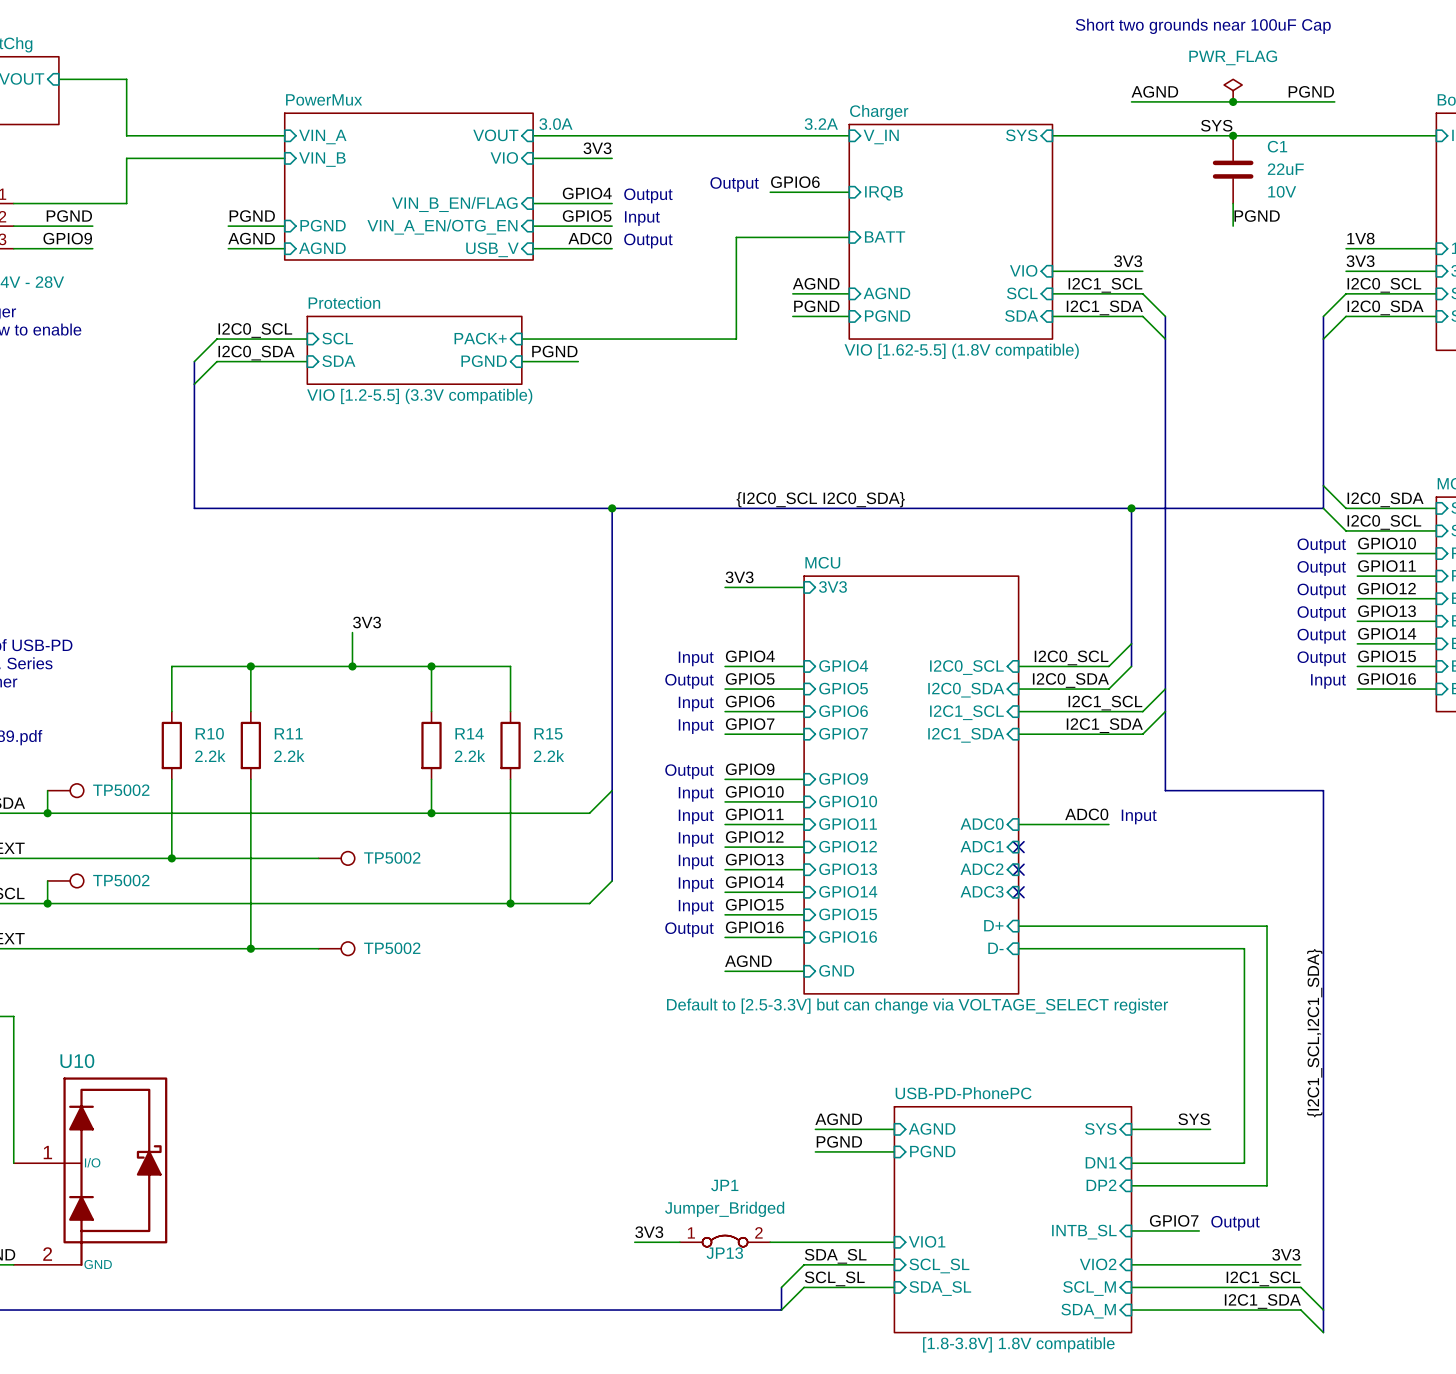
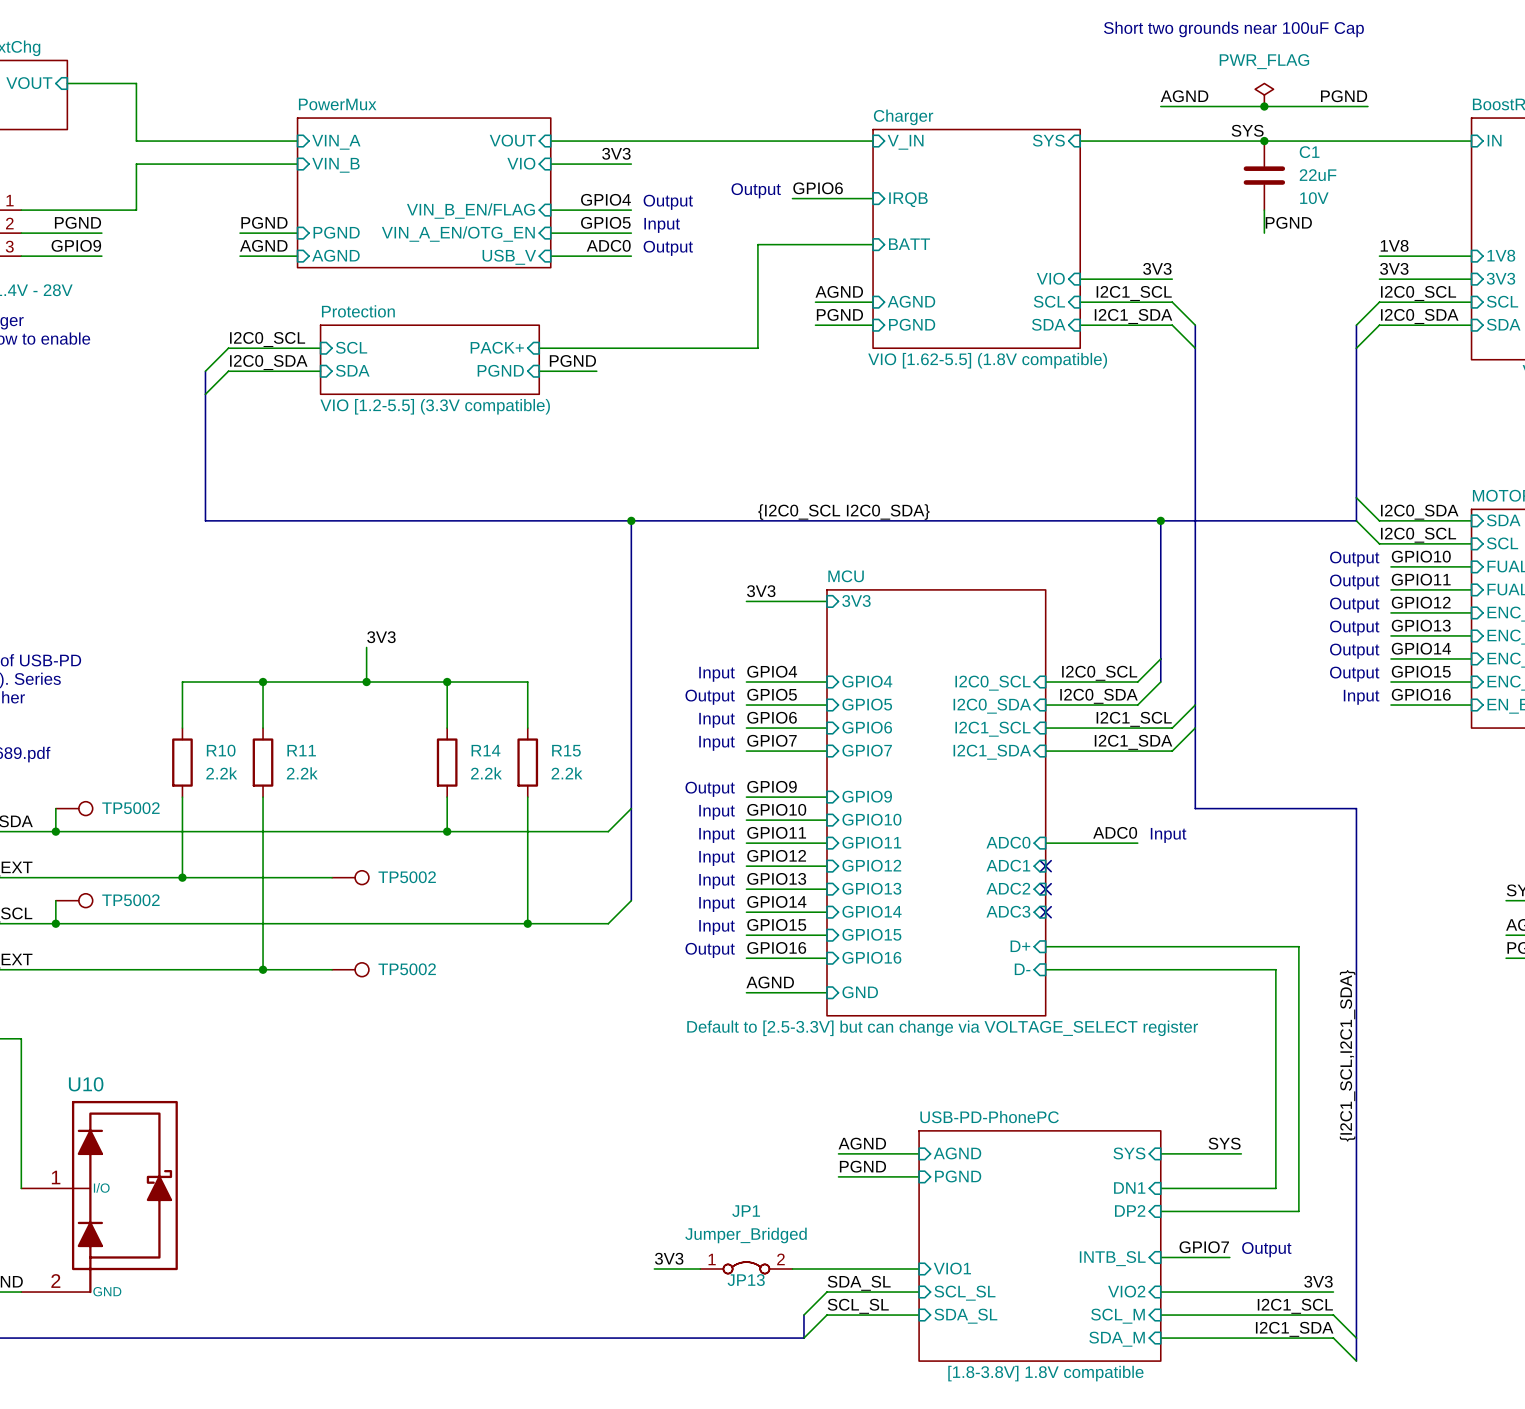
sheet PowerMux text: 3.0A (555, 124) -> none
sheet Charger text: 3.2A (821, 124) -> none

